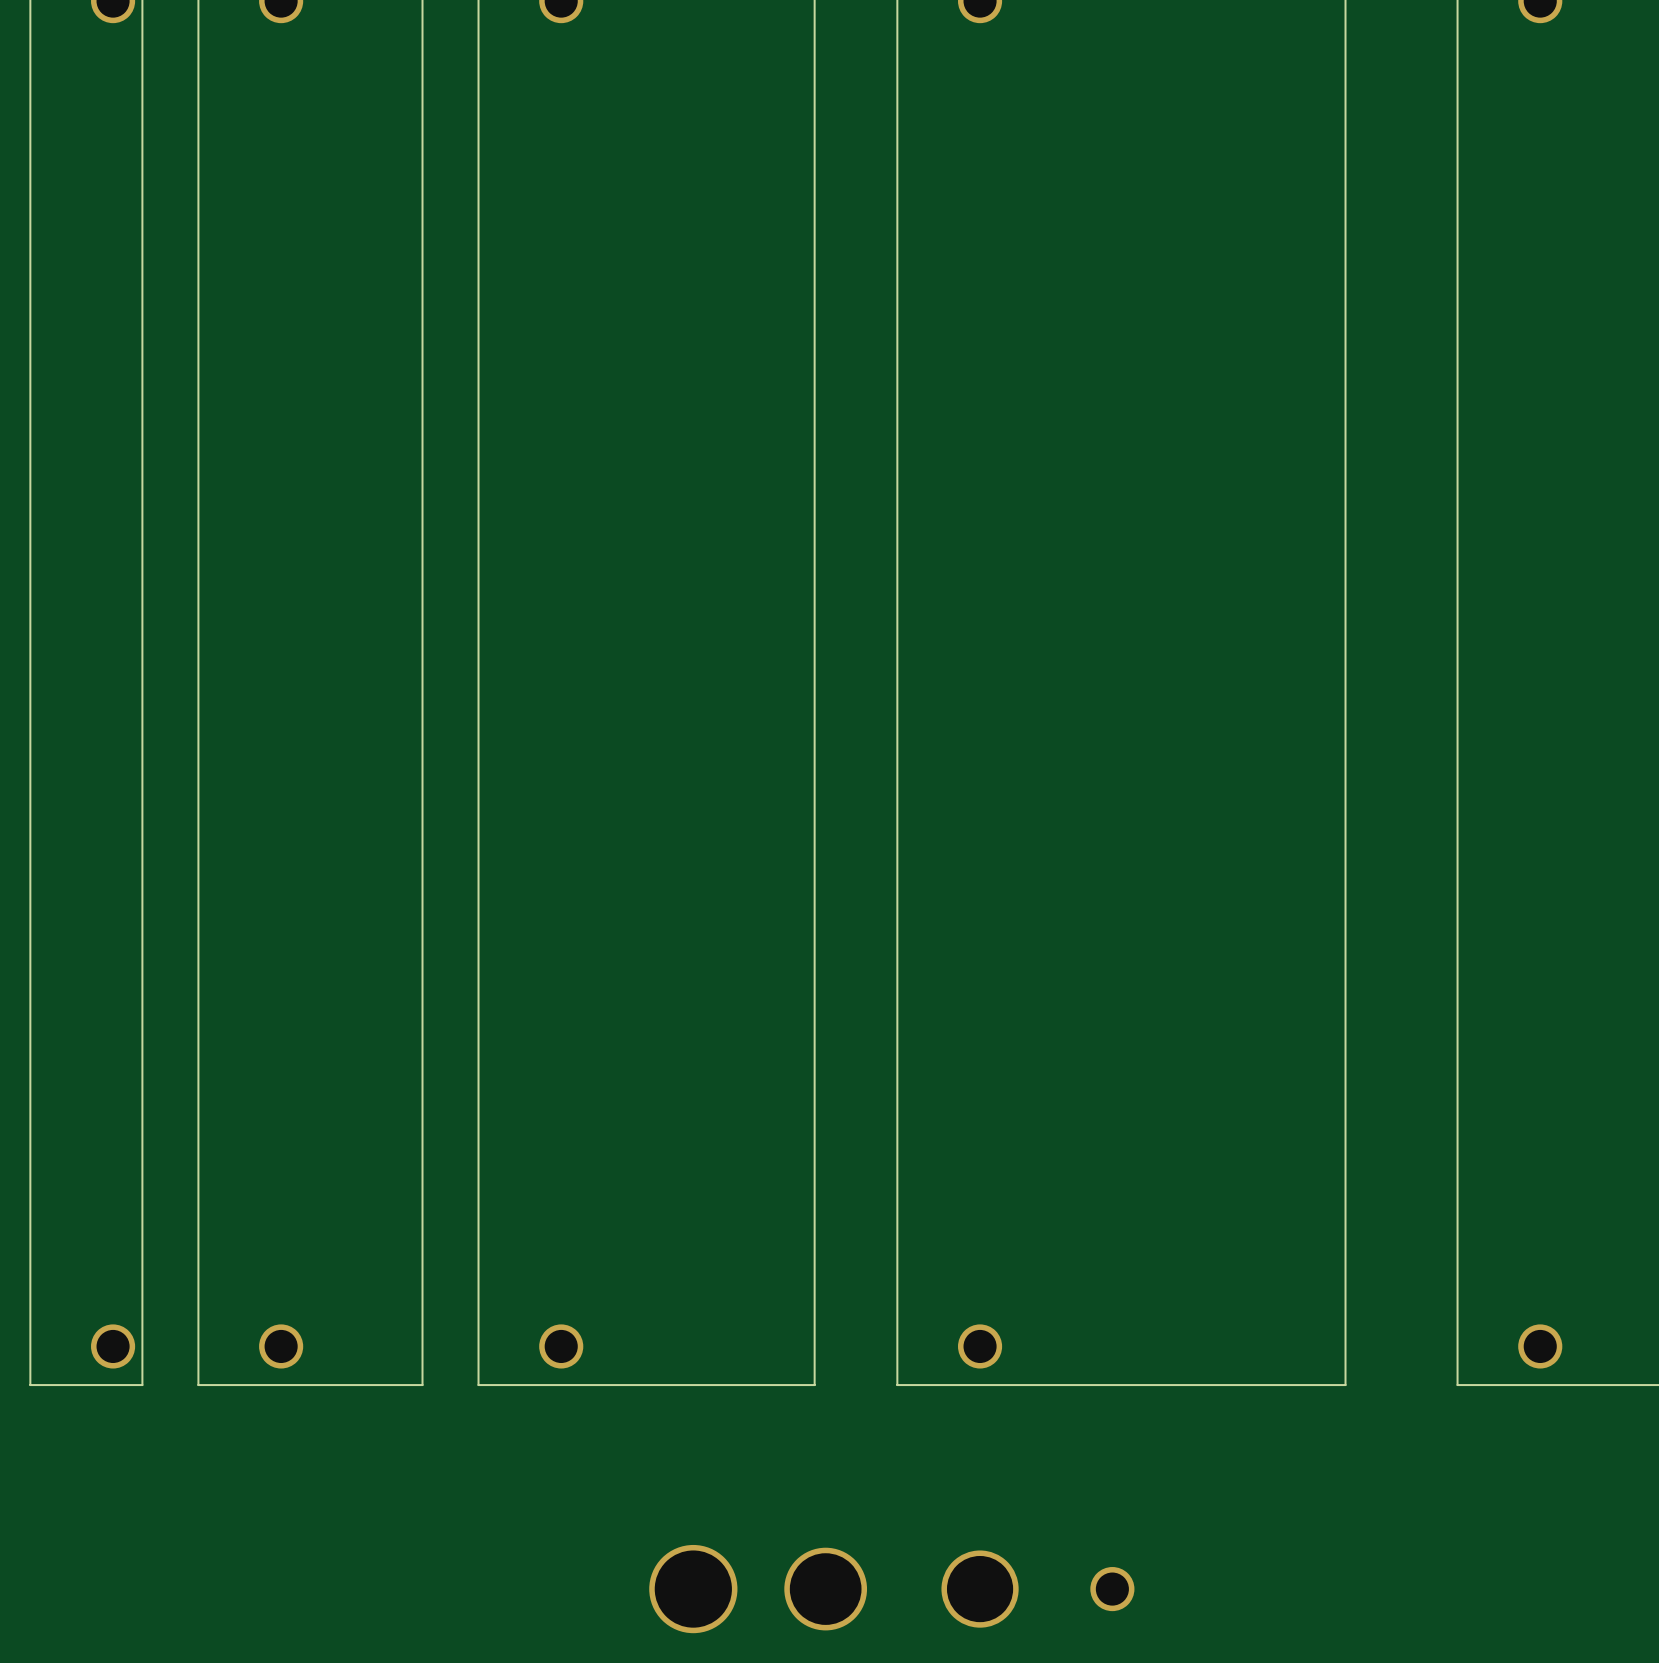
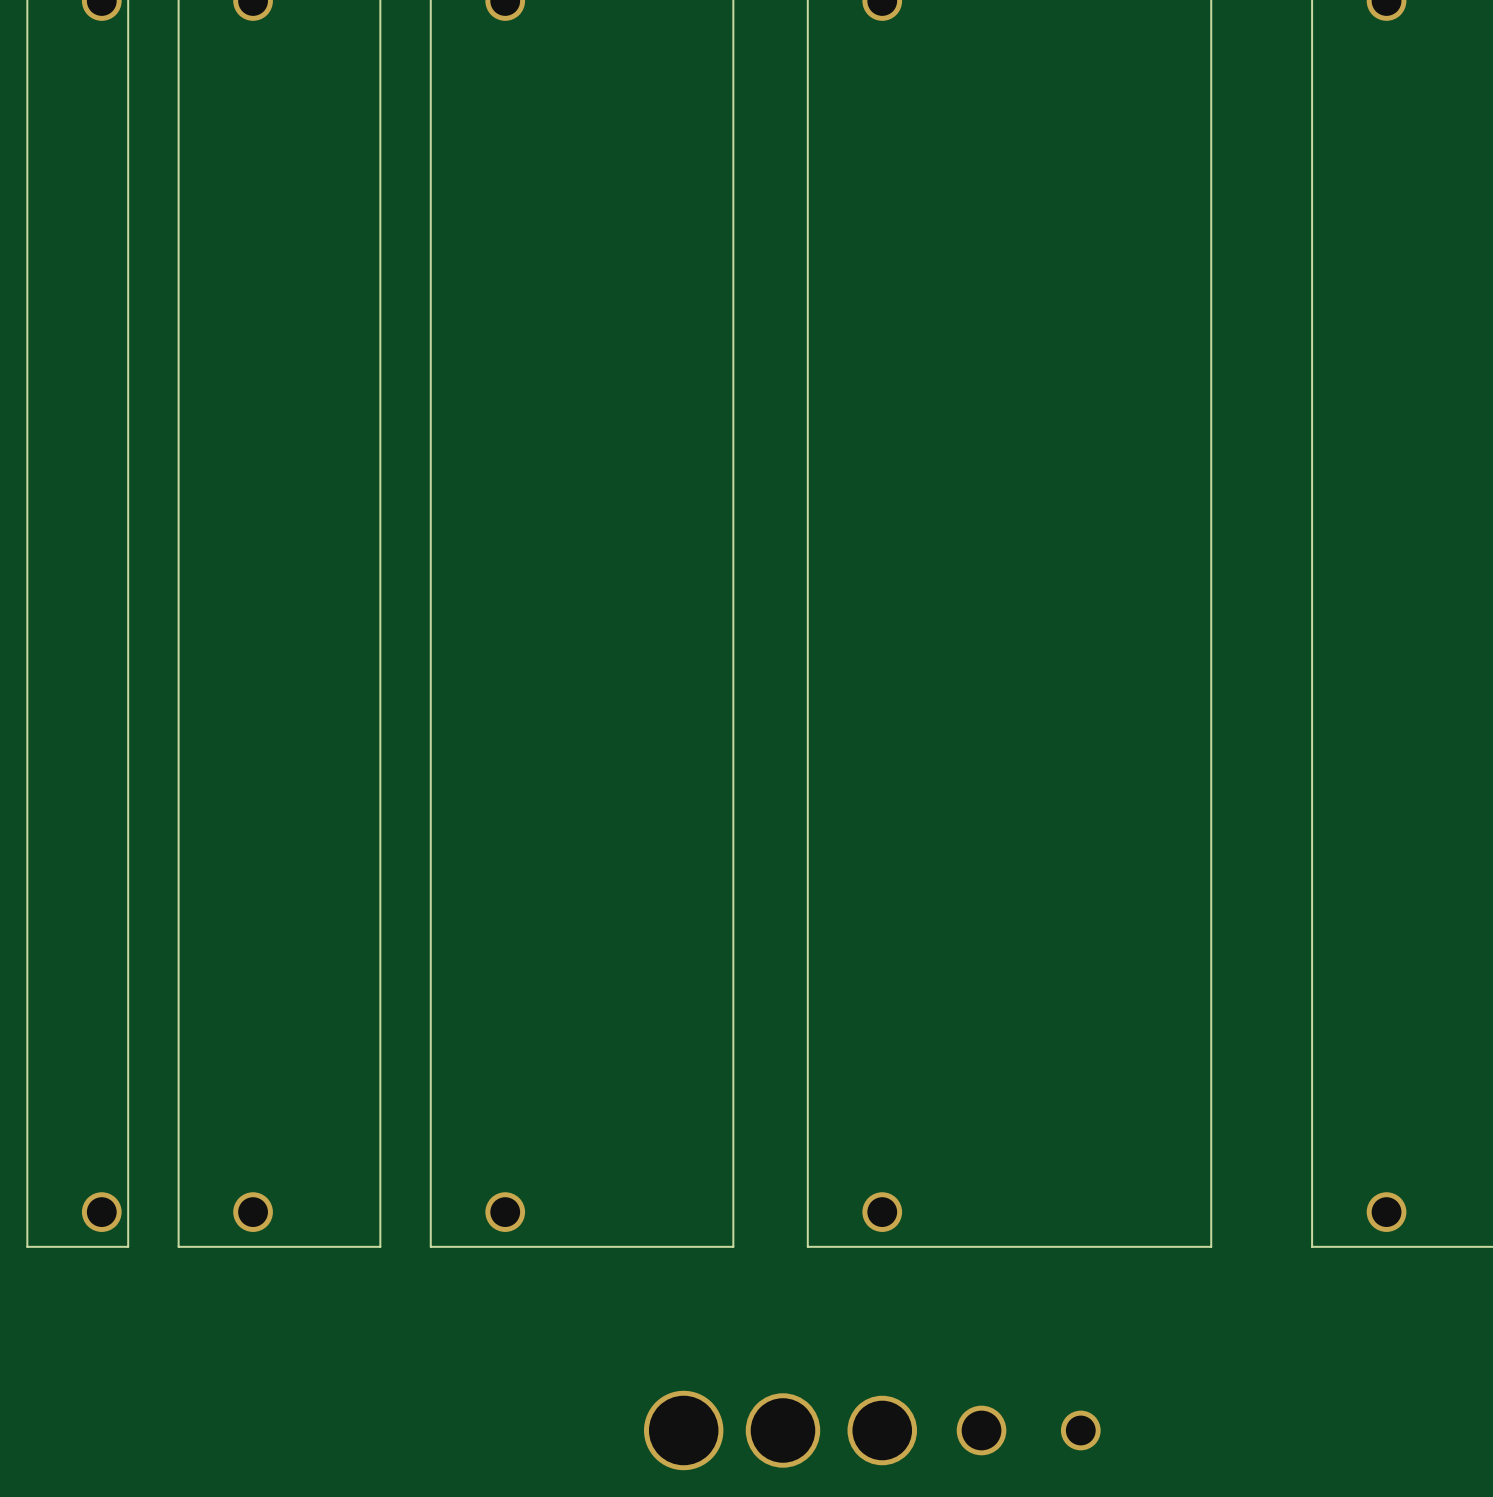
via position: (693, 1589) -> (683, 1430)
via position: (825, 1589) -> (782, 1430)
via: none -> (981, 1430)
via: (1112, 1589) -> none
via: none -> (1080, 1430)

